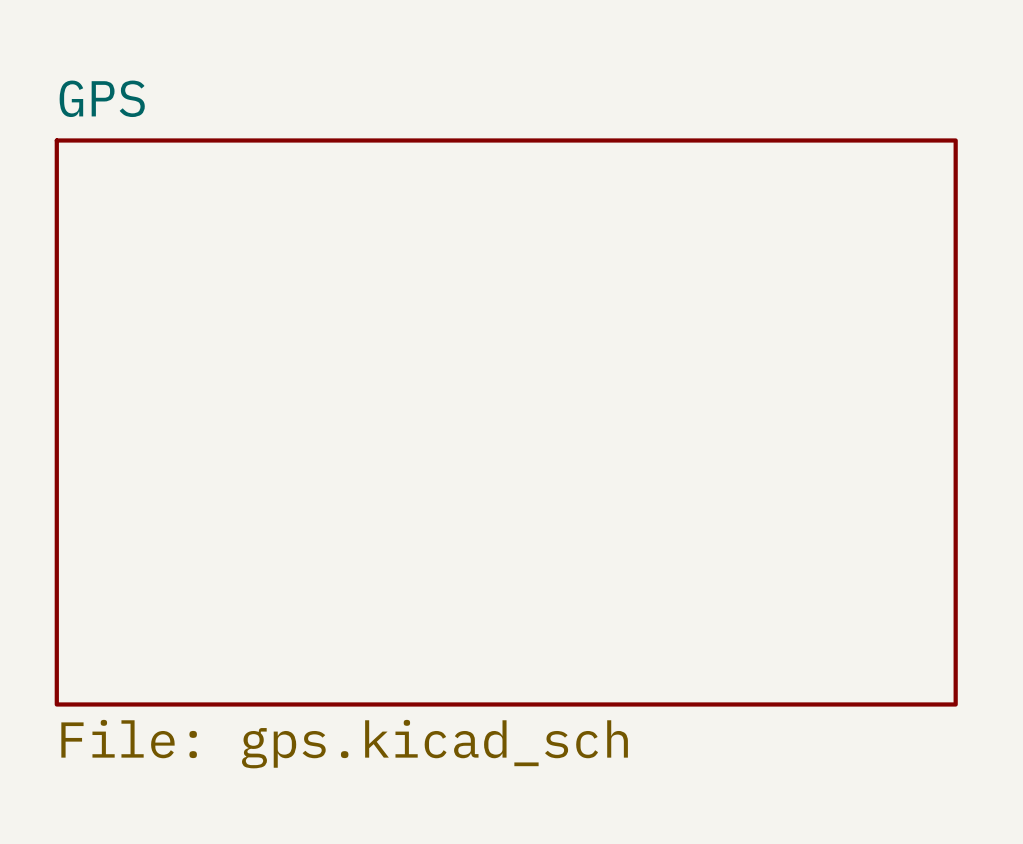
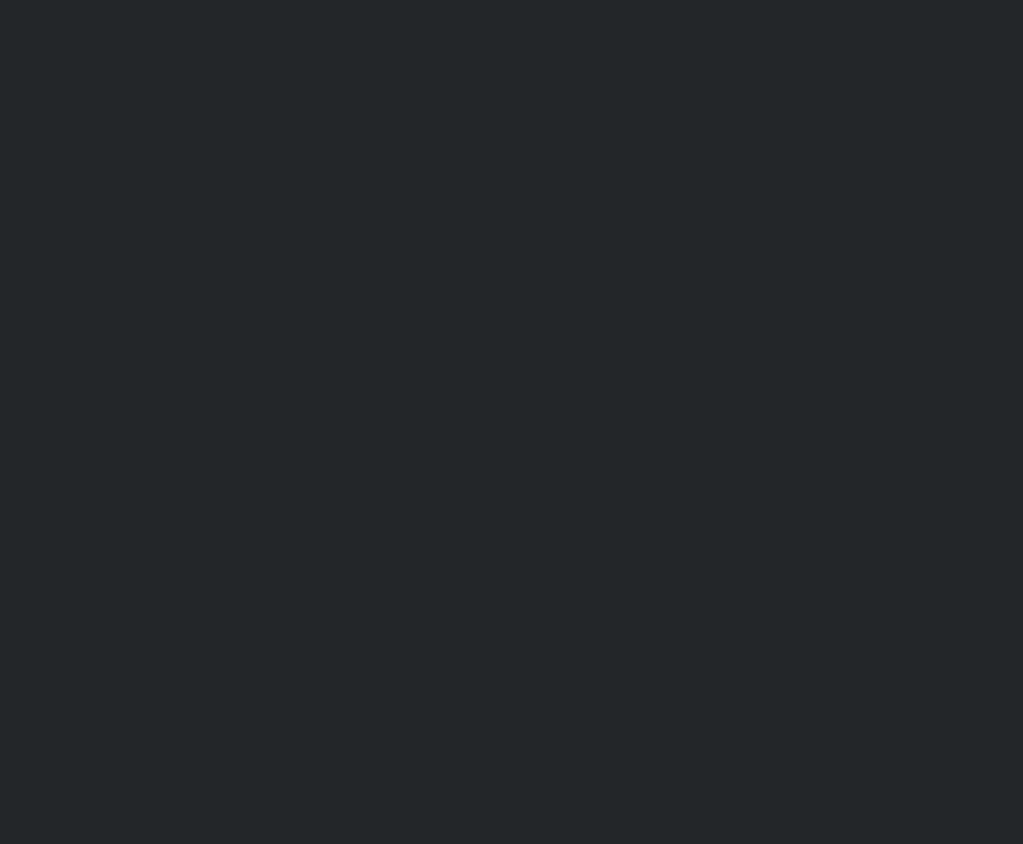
sheet GPS: File: gps.kicad_sch (506, 422) -> none

